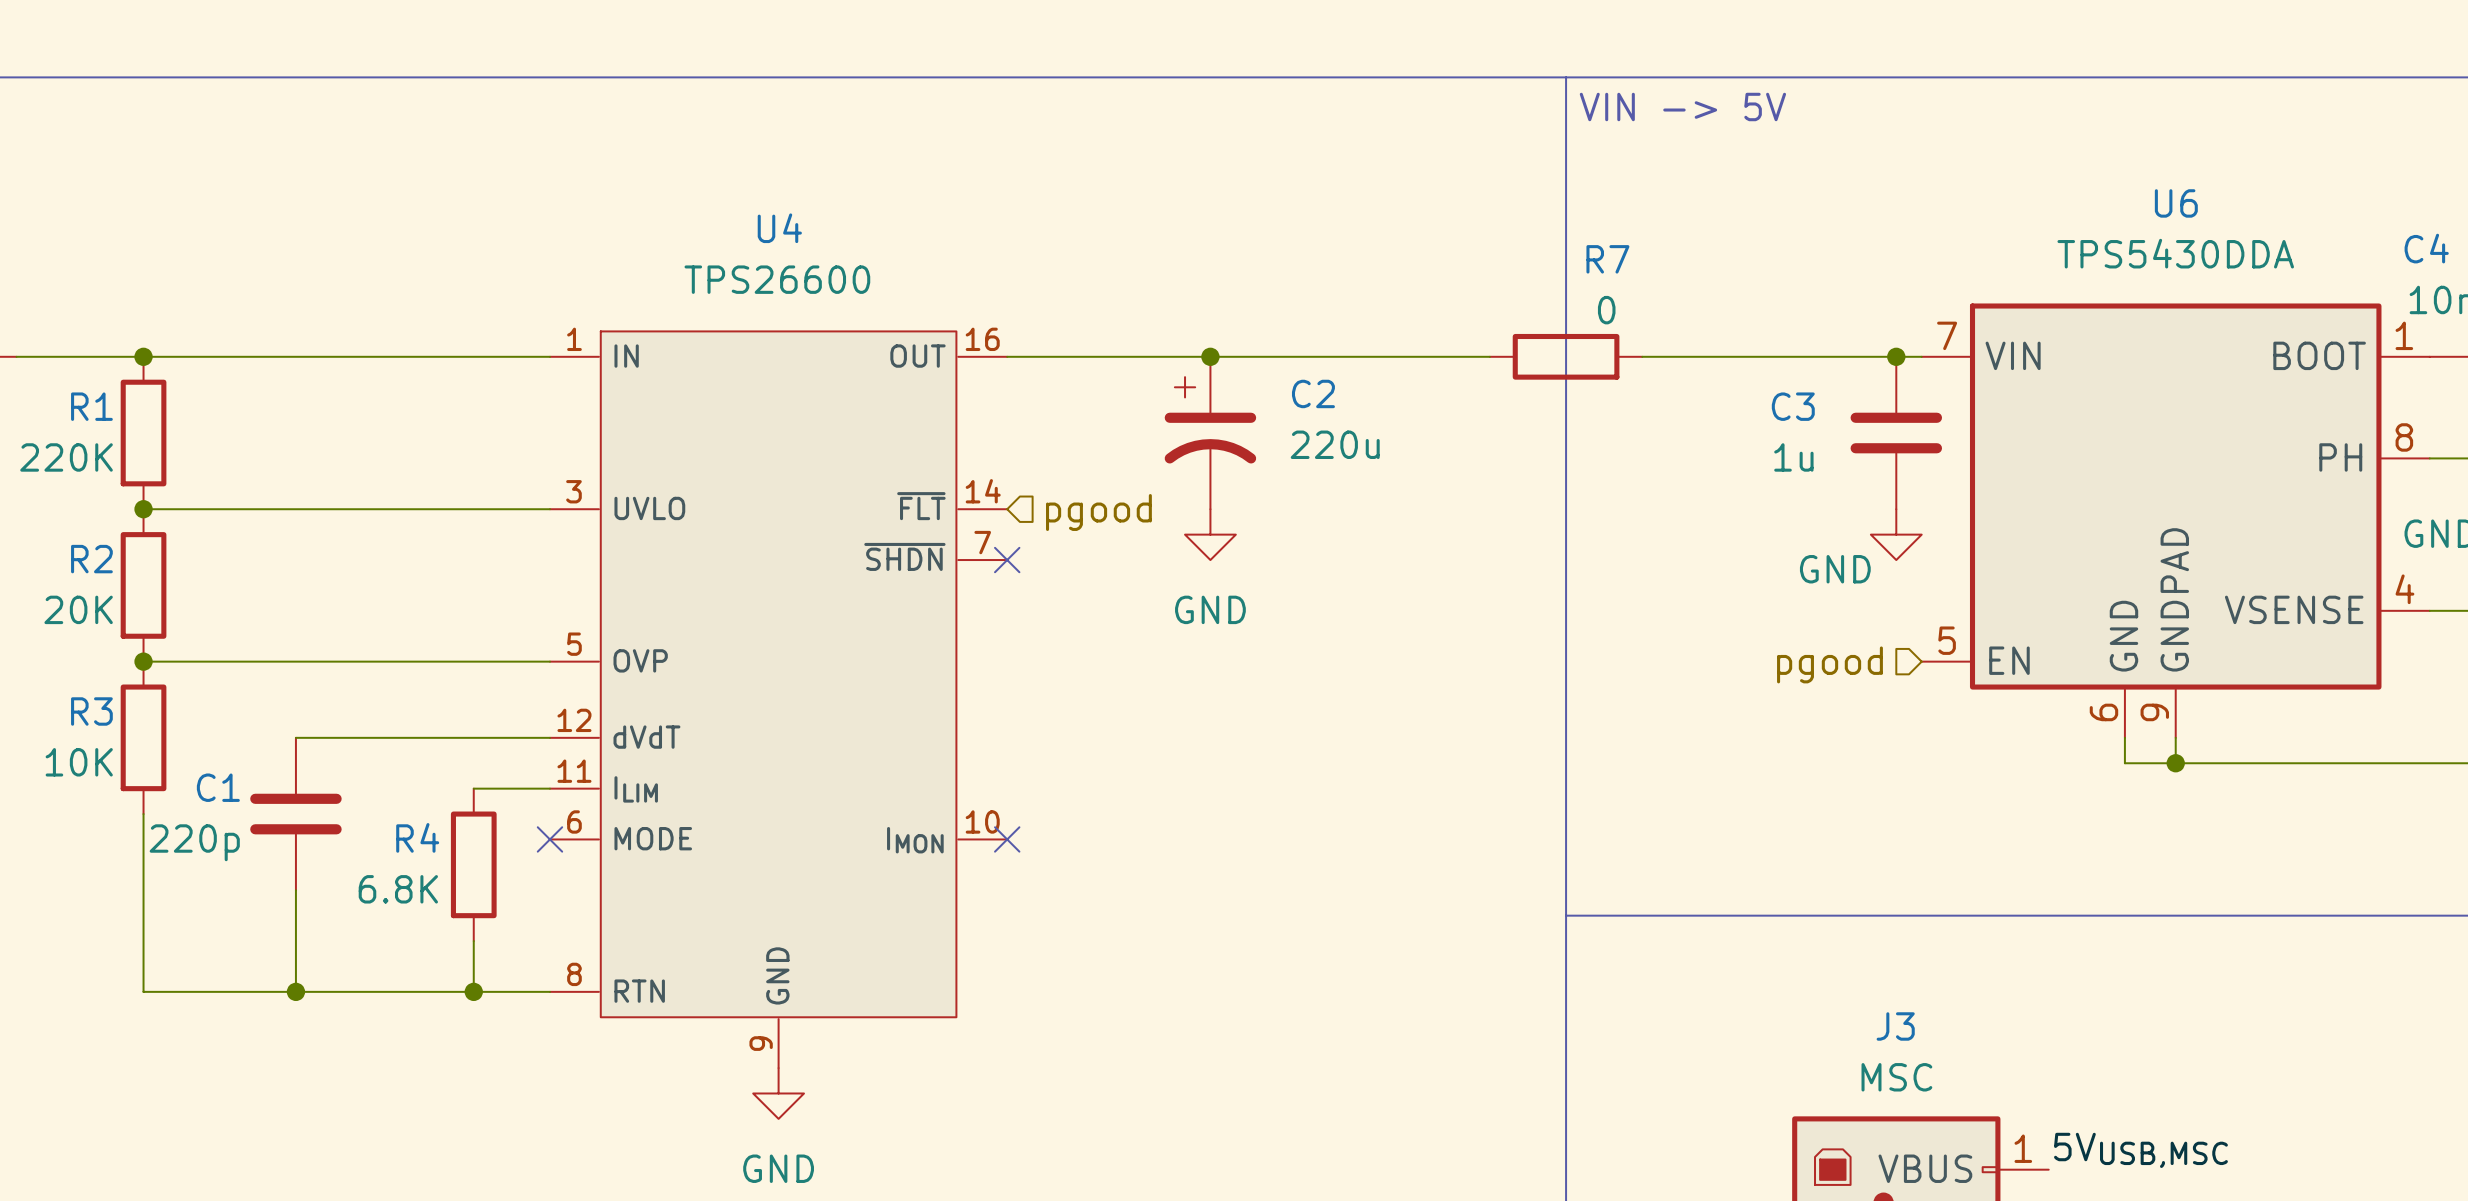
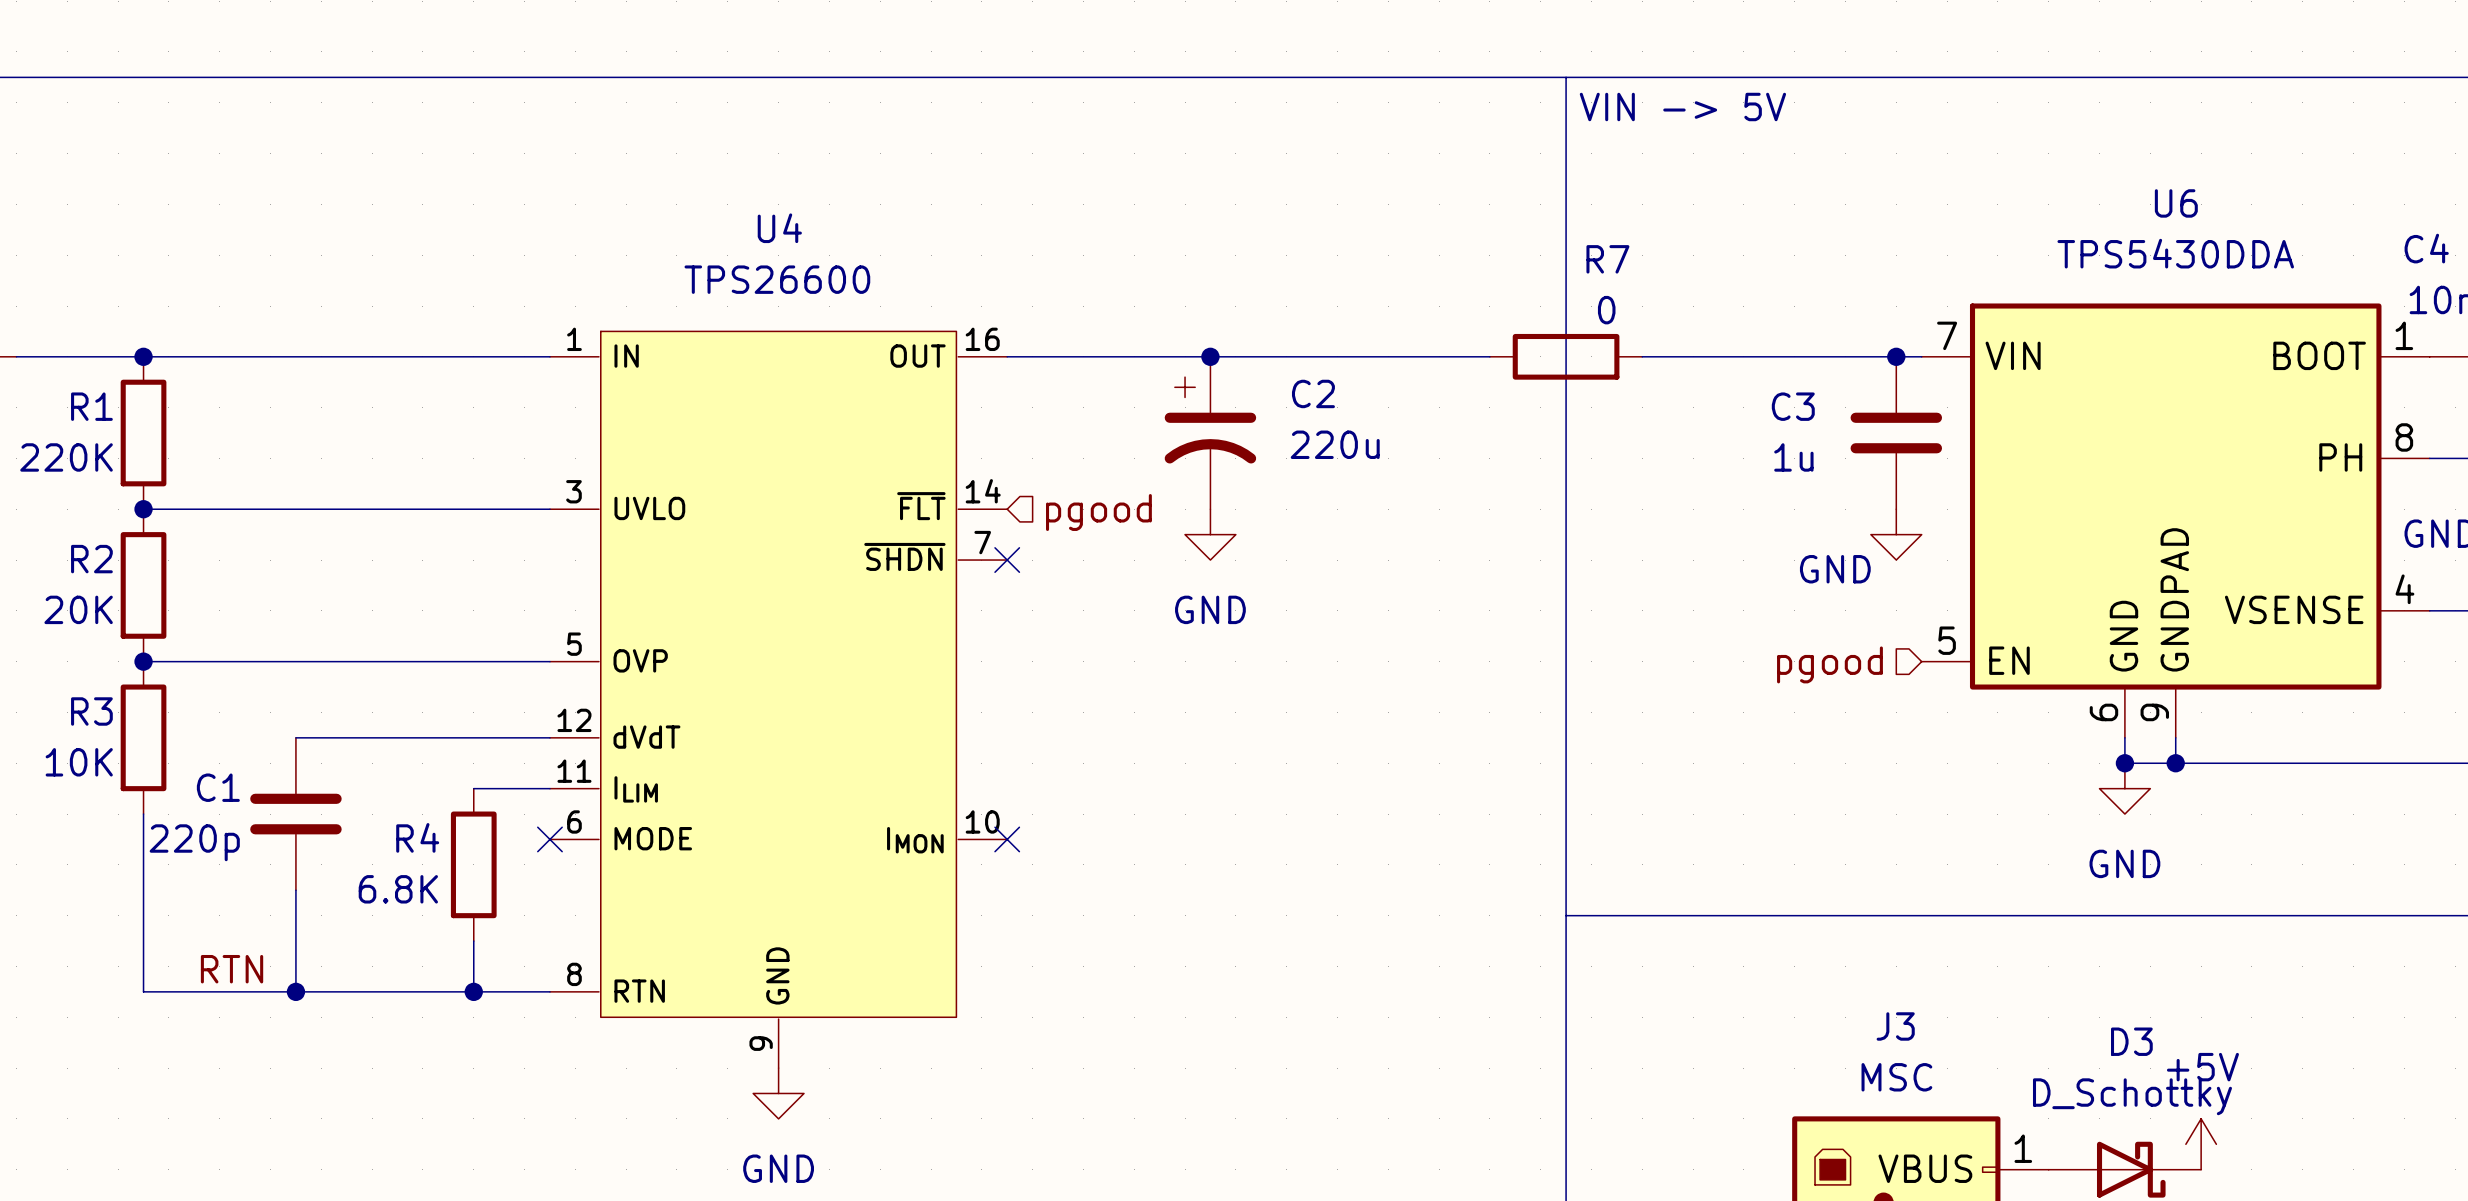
junction: none -> (2124, 763)
power symbol: none -> GND (2124, 788)
label: none -> RTN (232, 969)
power symbol: none -> +5V (2201, 1144)
label: 5VUSB,MSC (2140, 1150) -> none
D3: none -> D_Schottky (2124, 1169)

